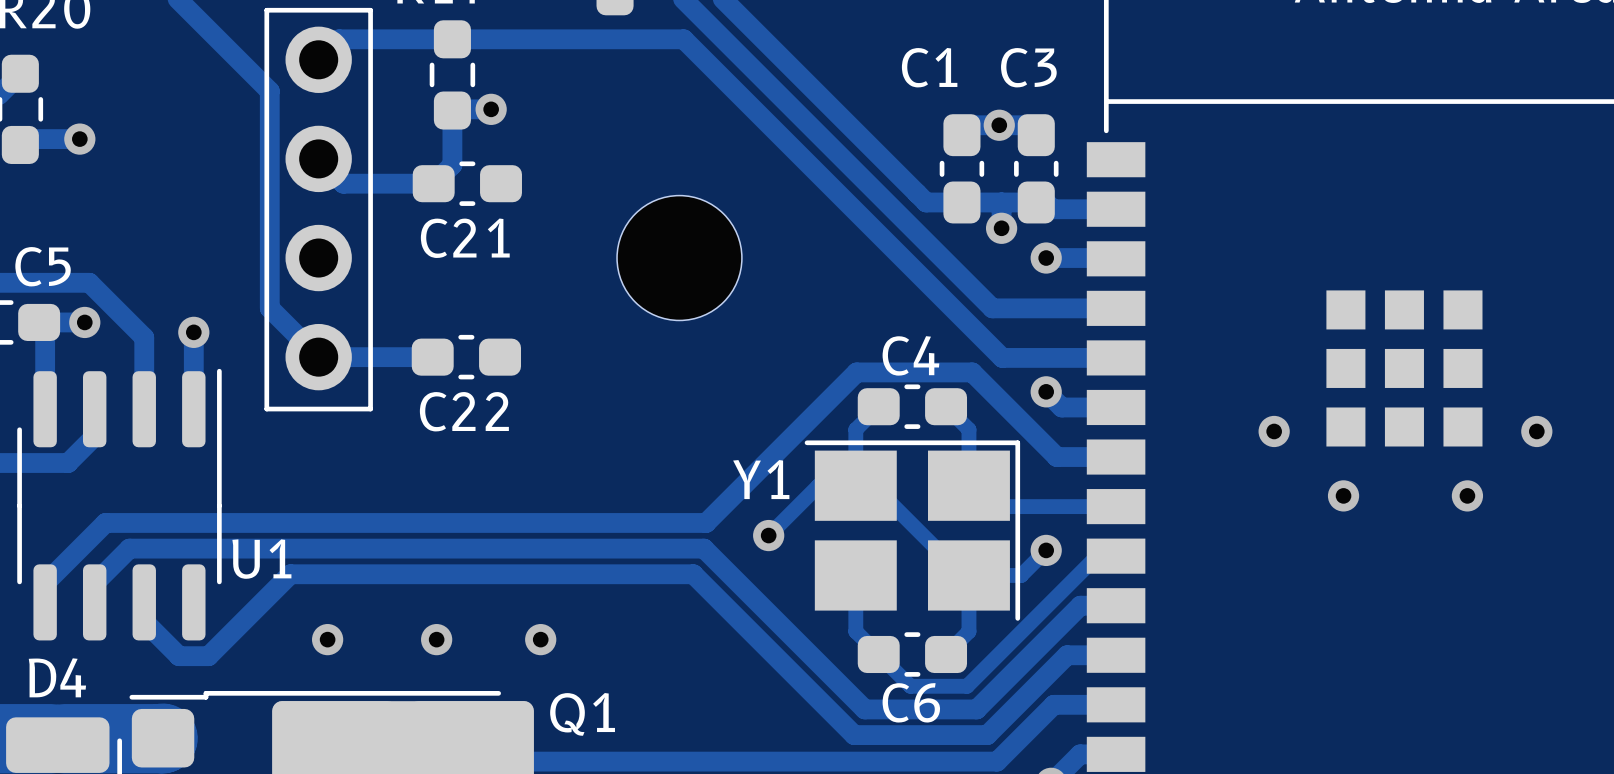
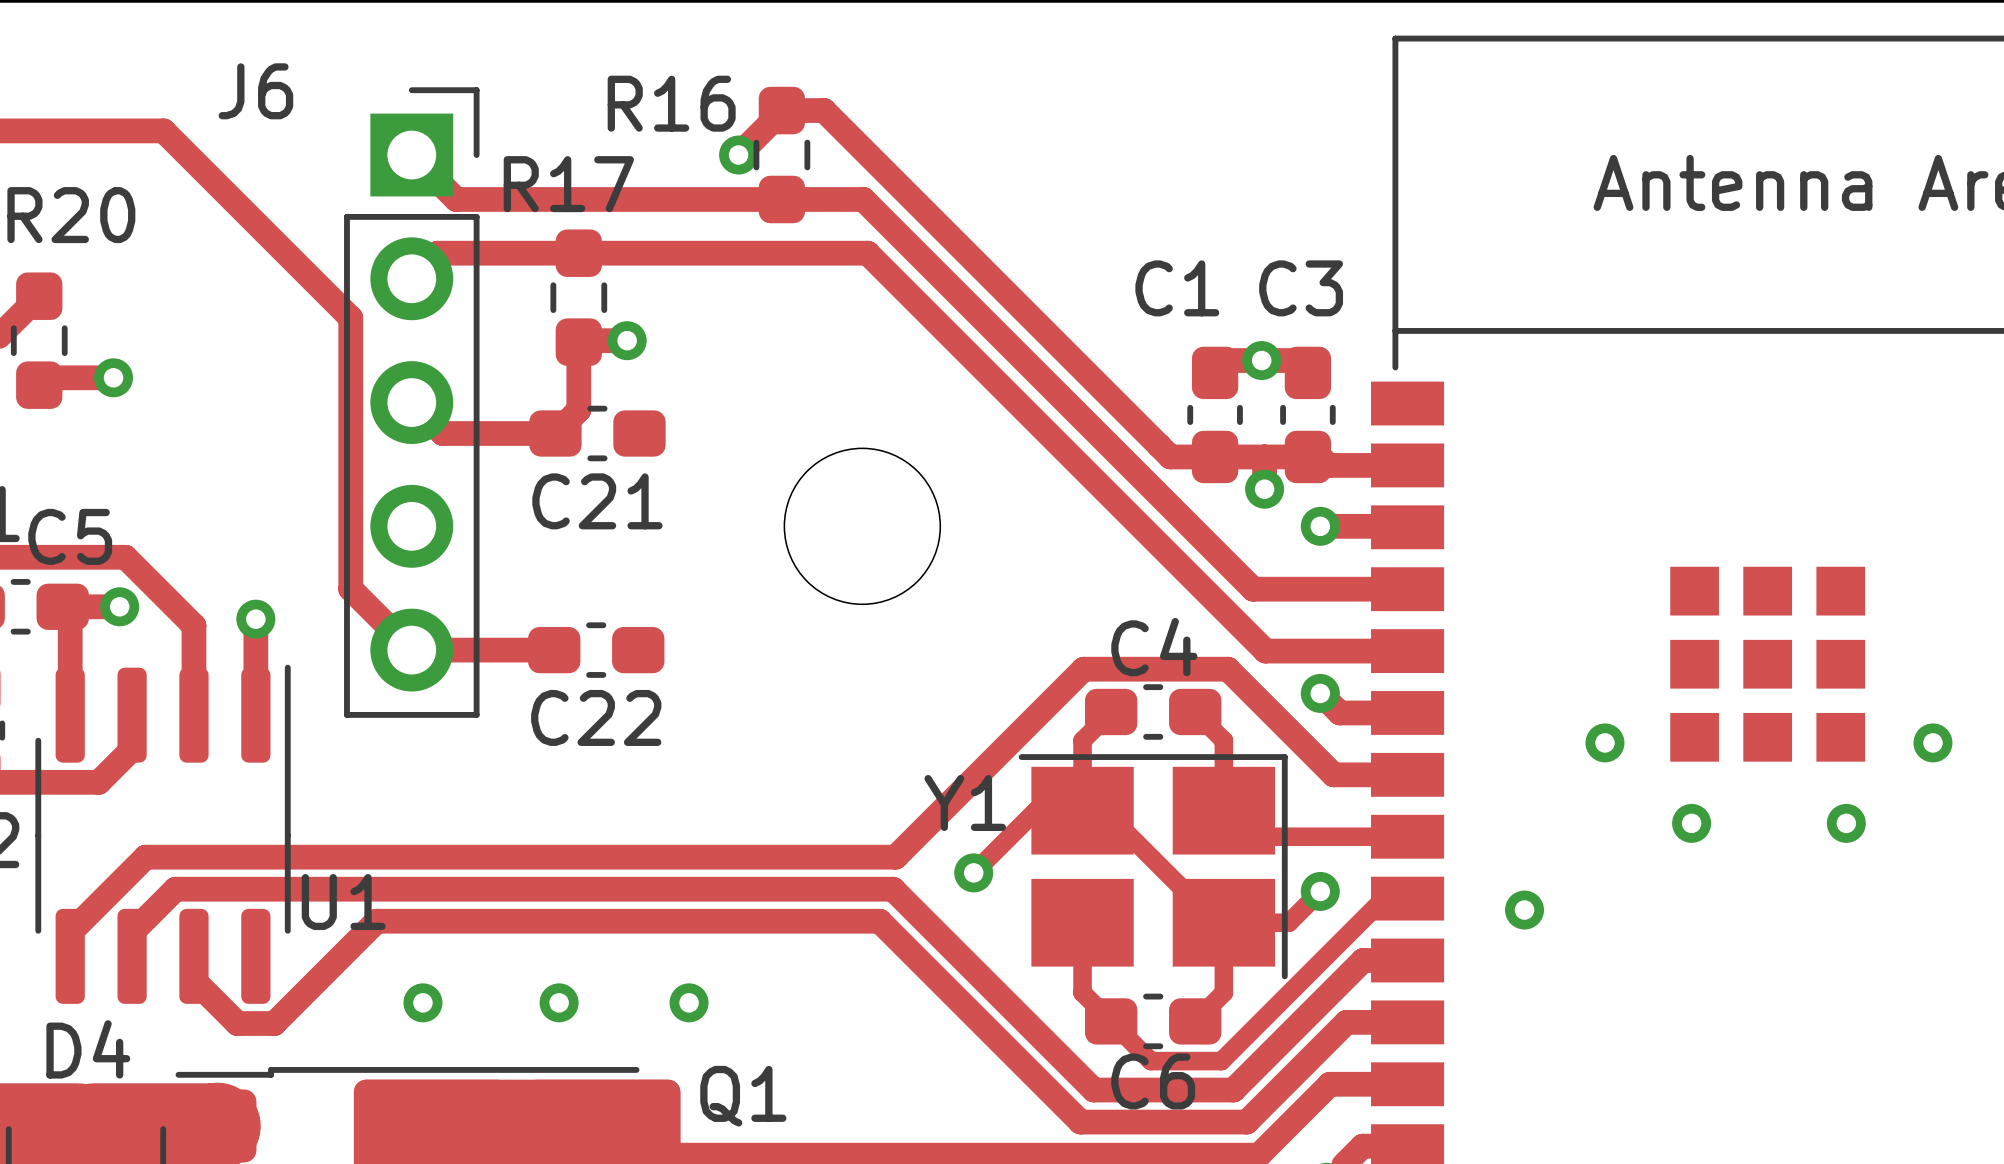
via: none -> (1524, 910)

